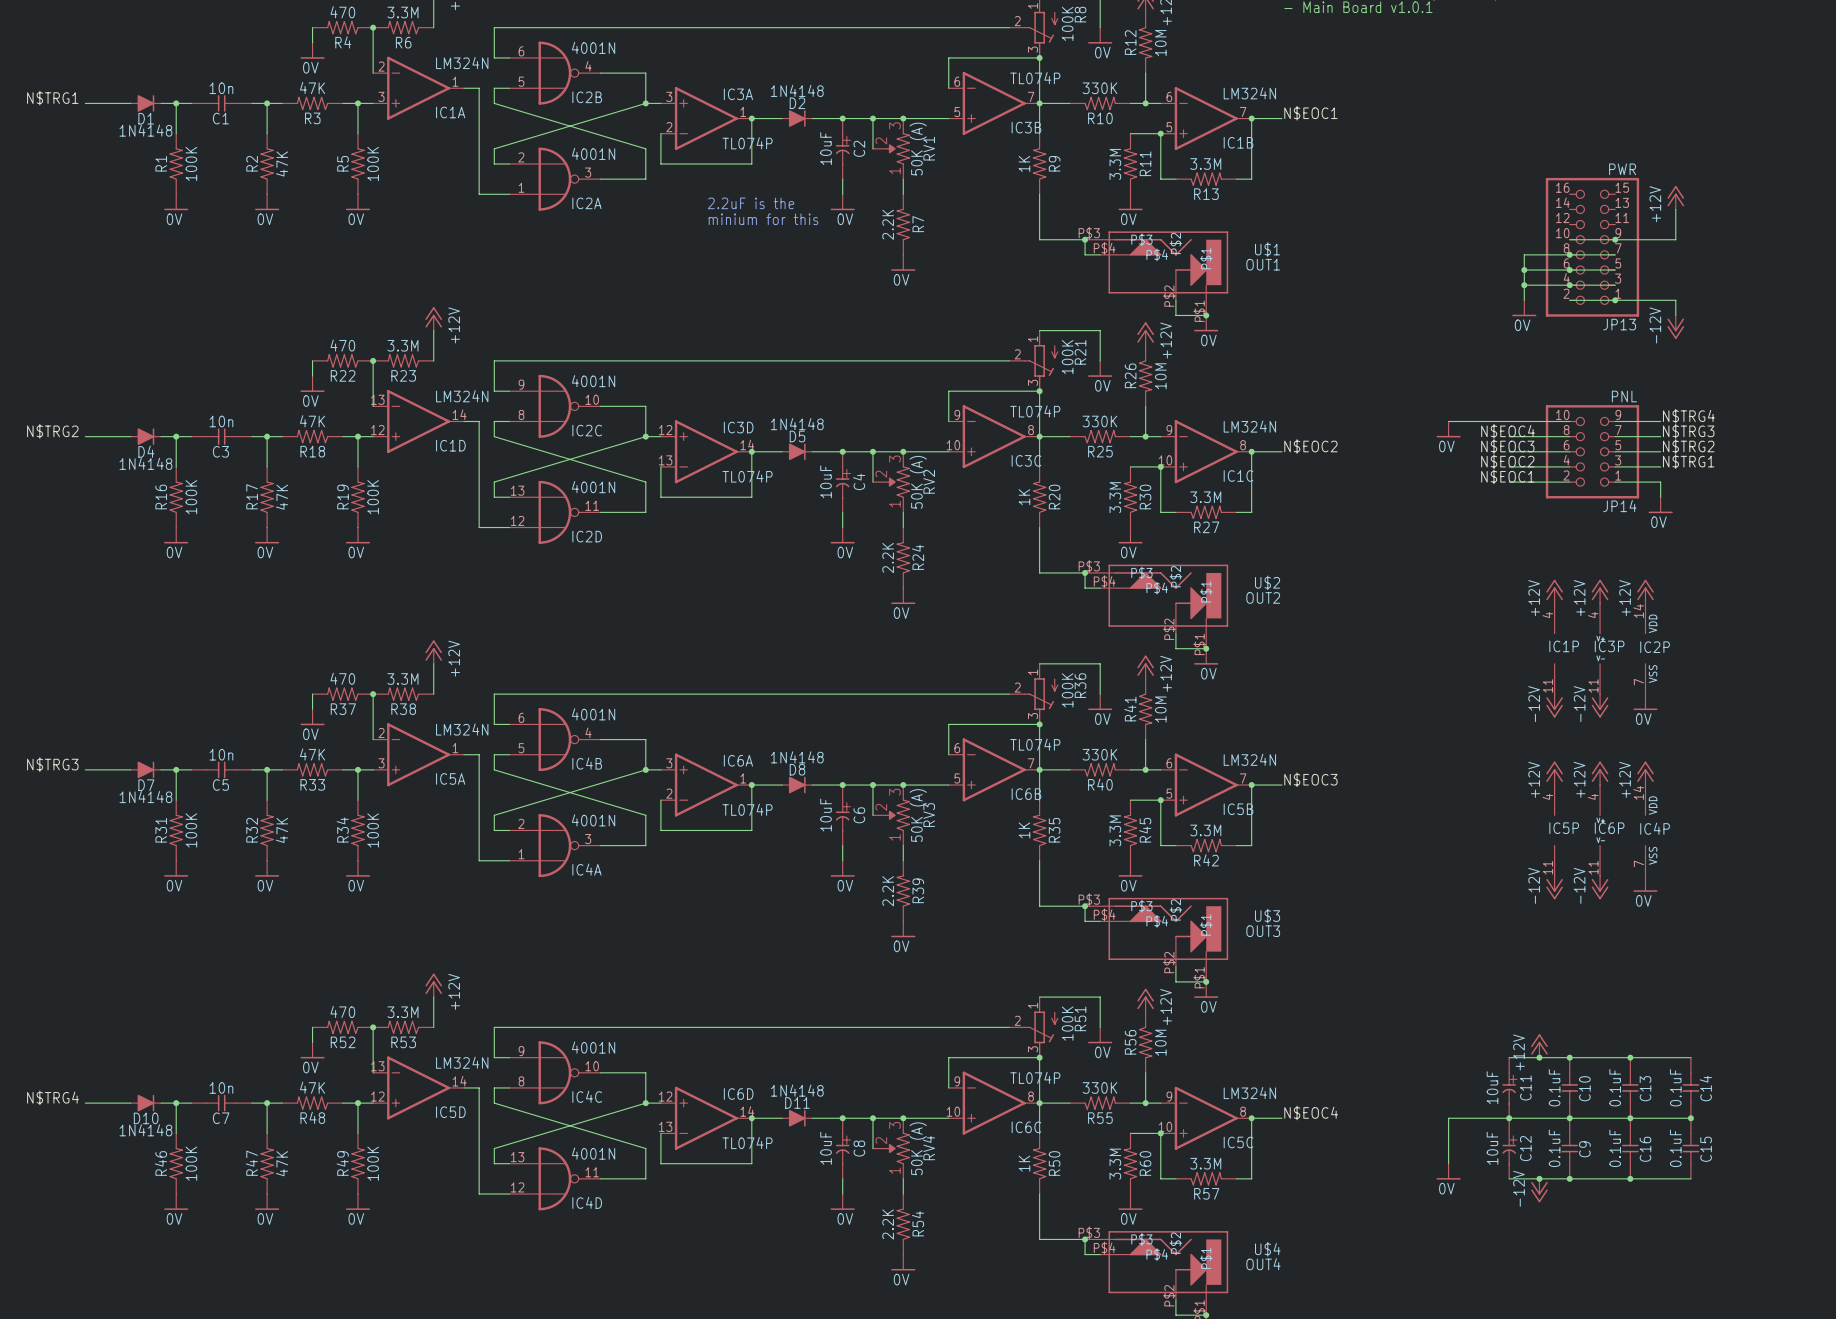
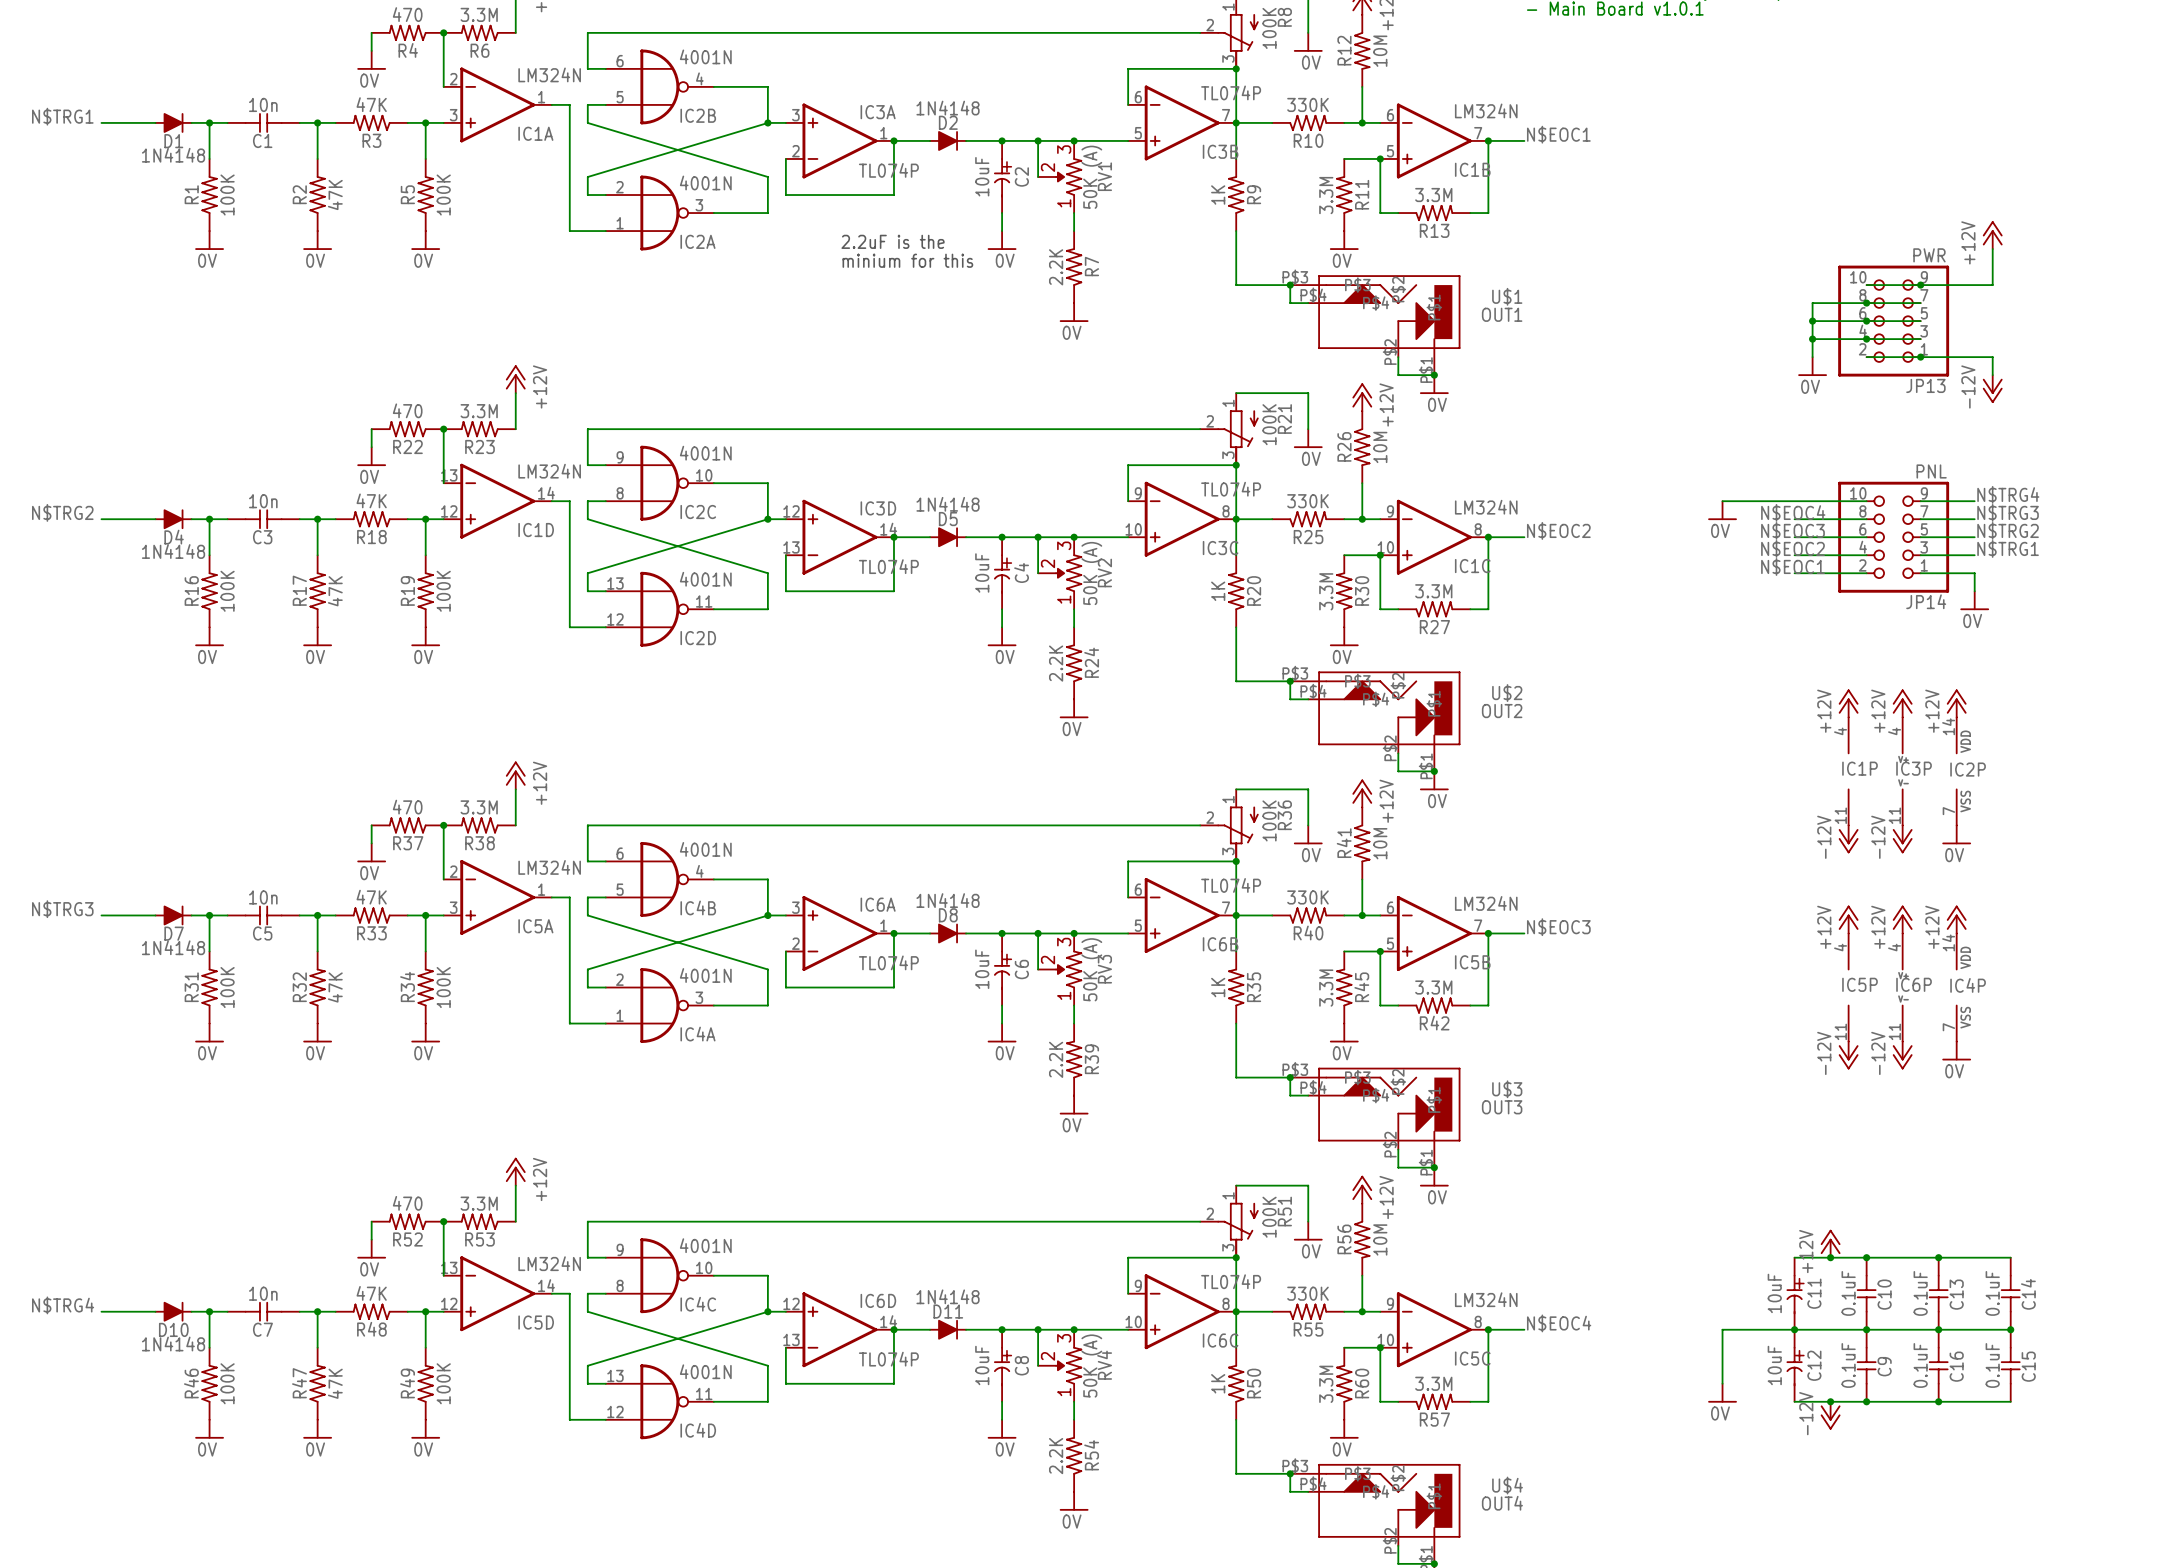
JP13 value position: PWR (1622, 169) -> PWR (1929, 255)
JP13 symbol: [1545, 177, 1640, 317] -> [1838, 265, 1950, 377]

